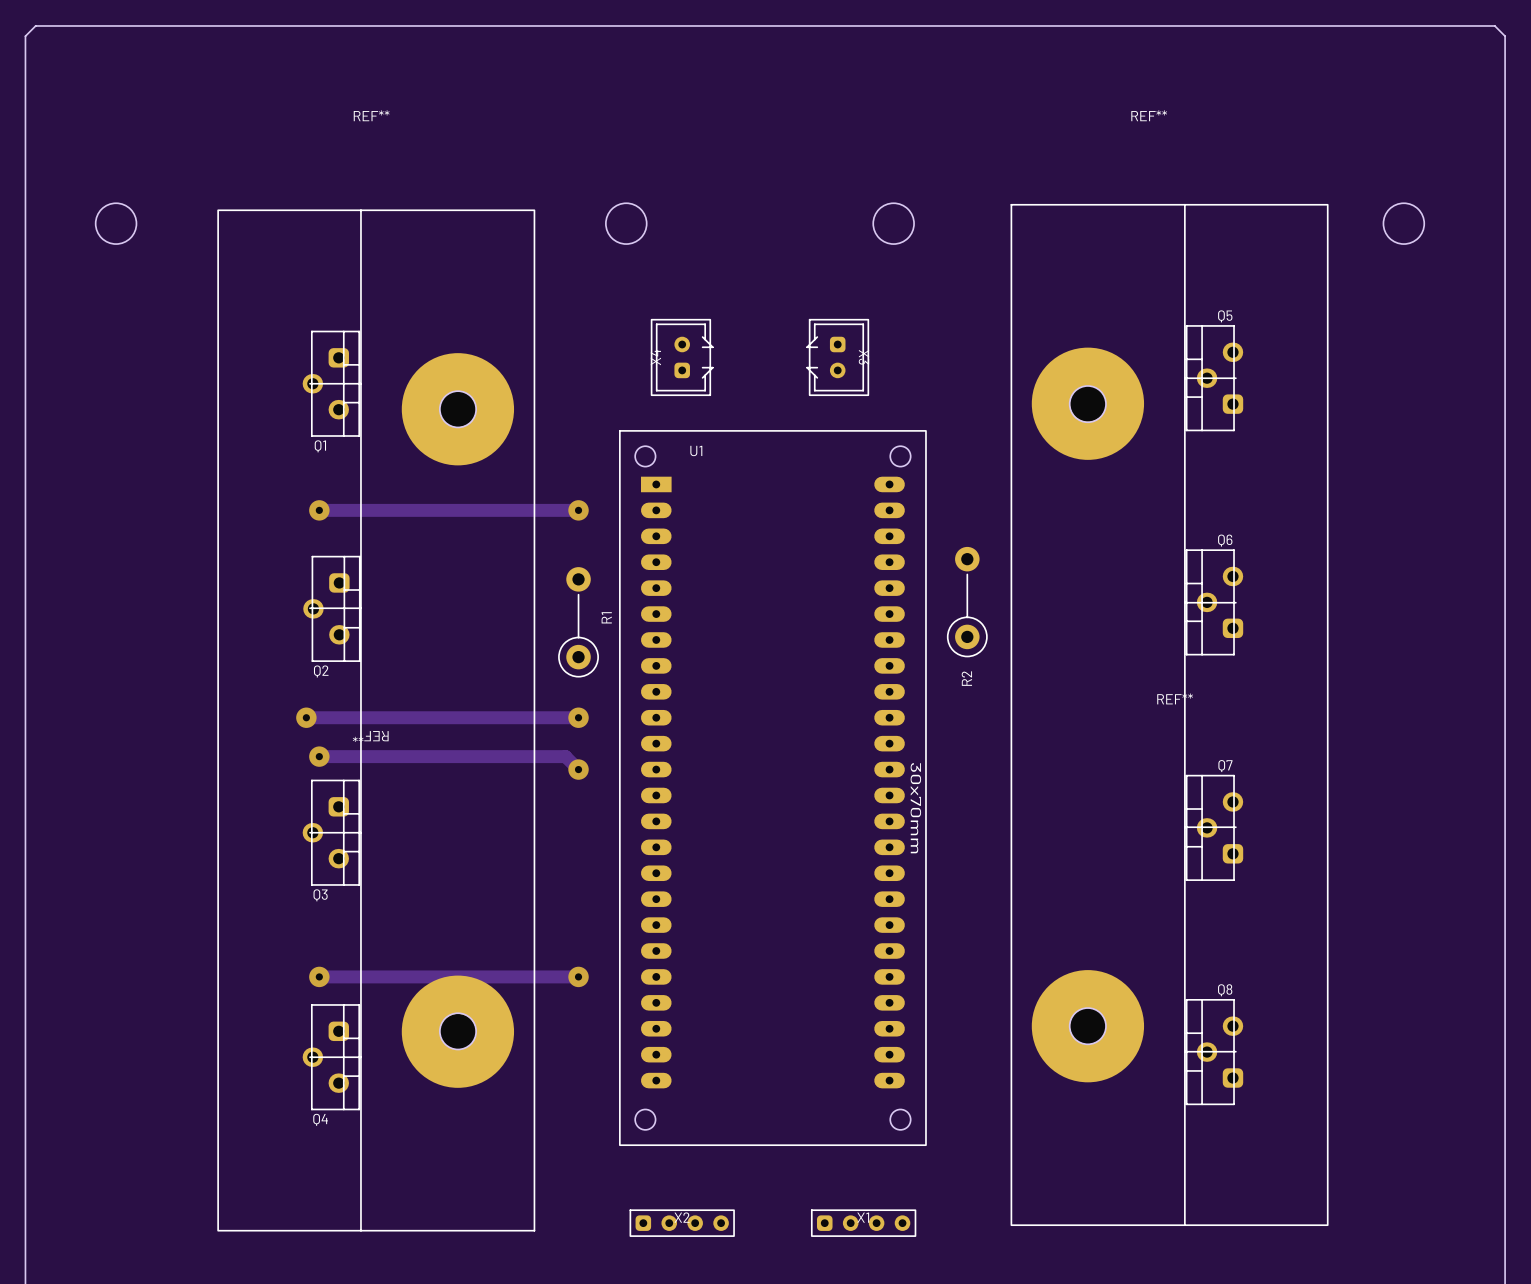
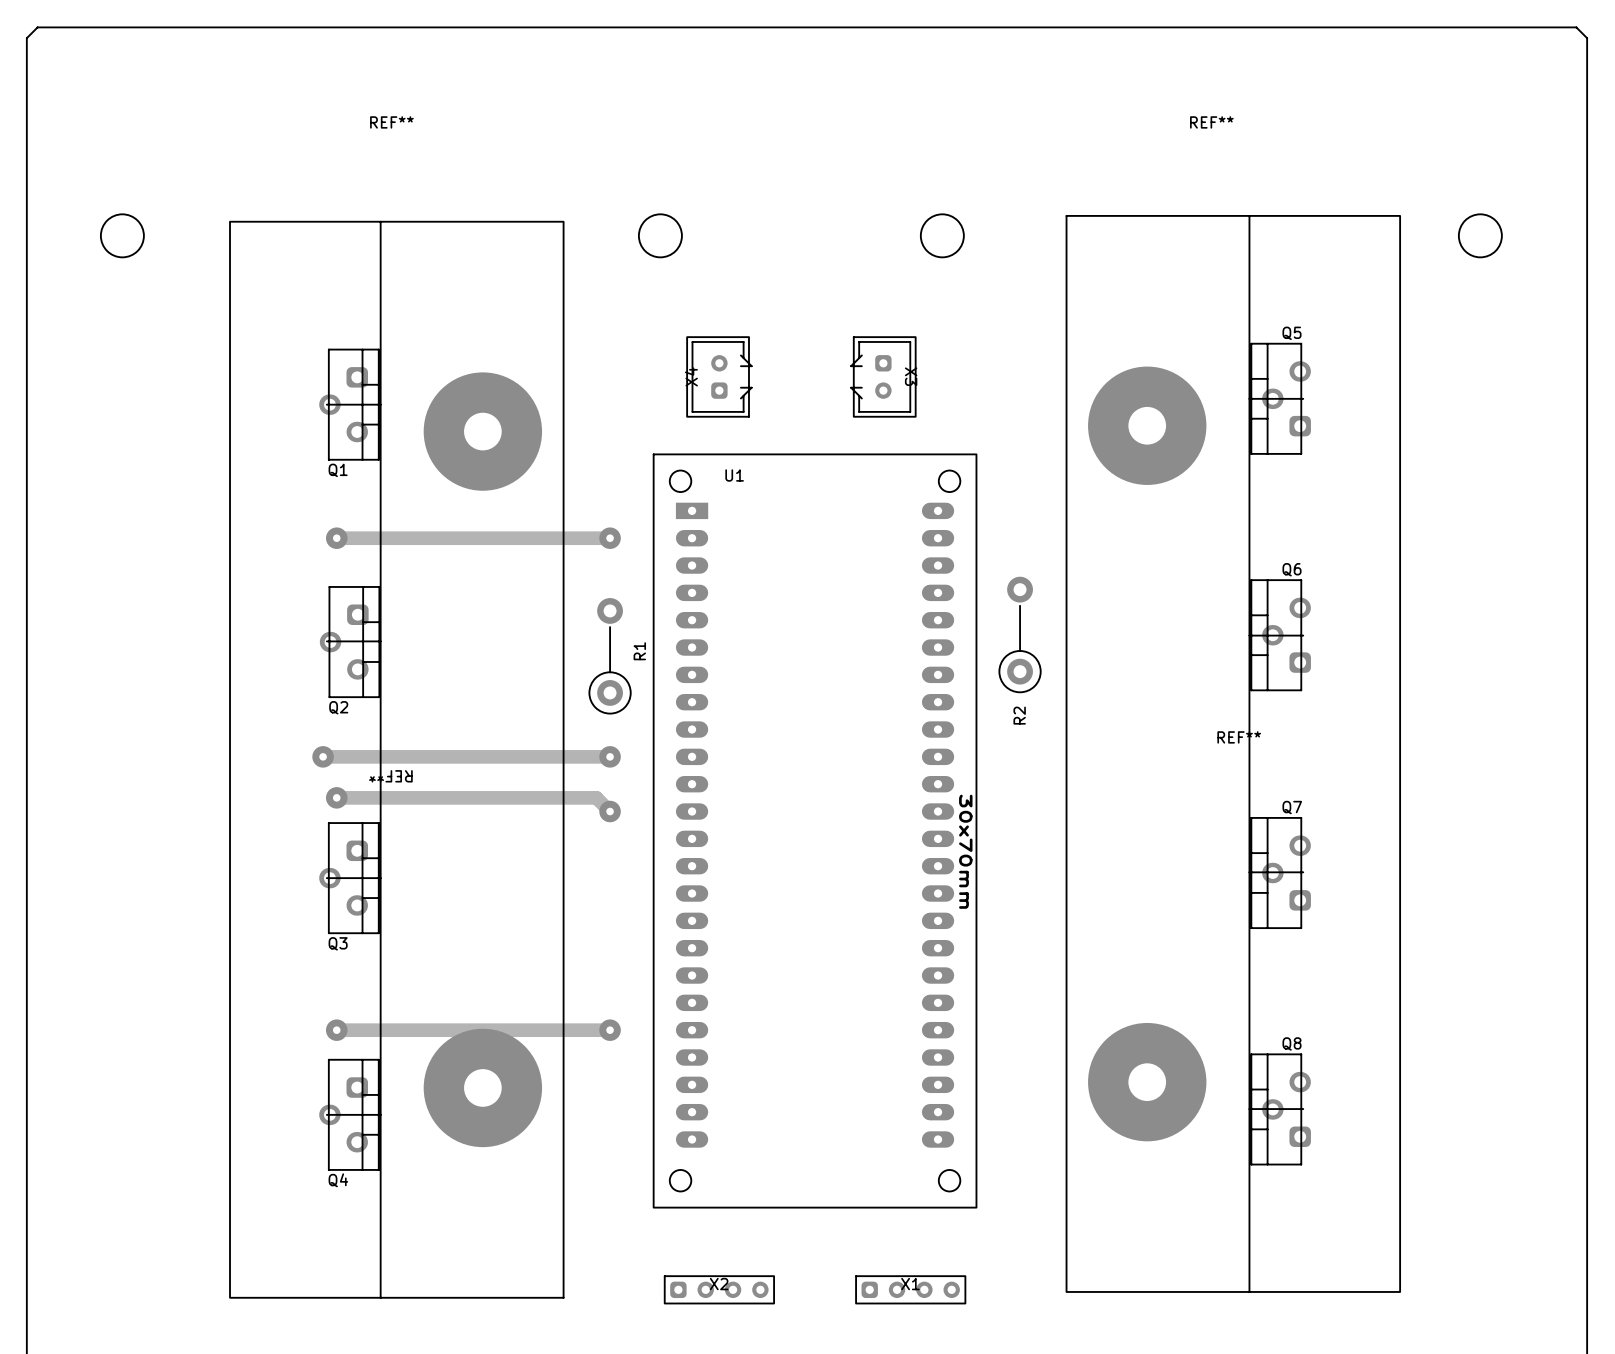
REF** footprint: [1010, 204, 1329, 1226] -> [1065, 215, 1401, 1293]
REF** footprint: [217, 209, 536, 1232] -> [229, 221, 565, 1299]

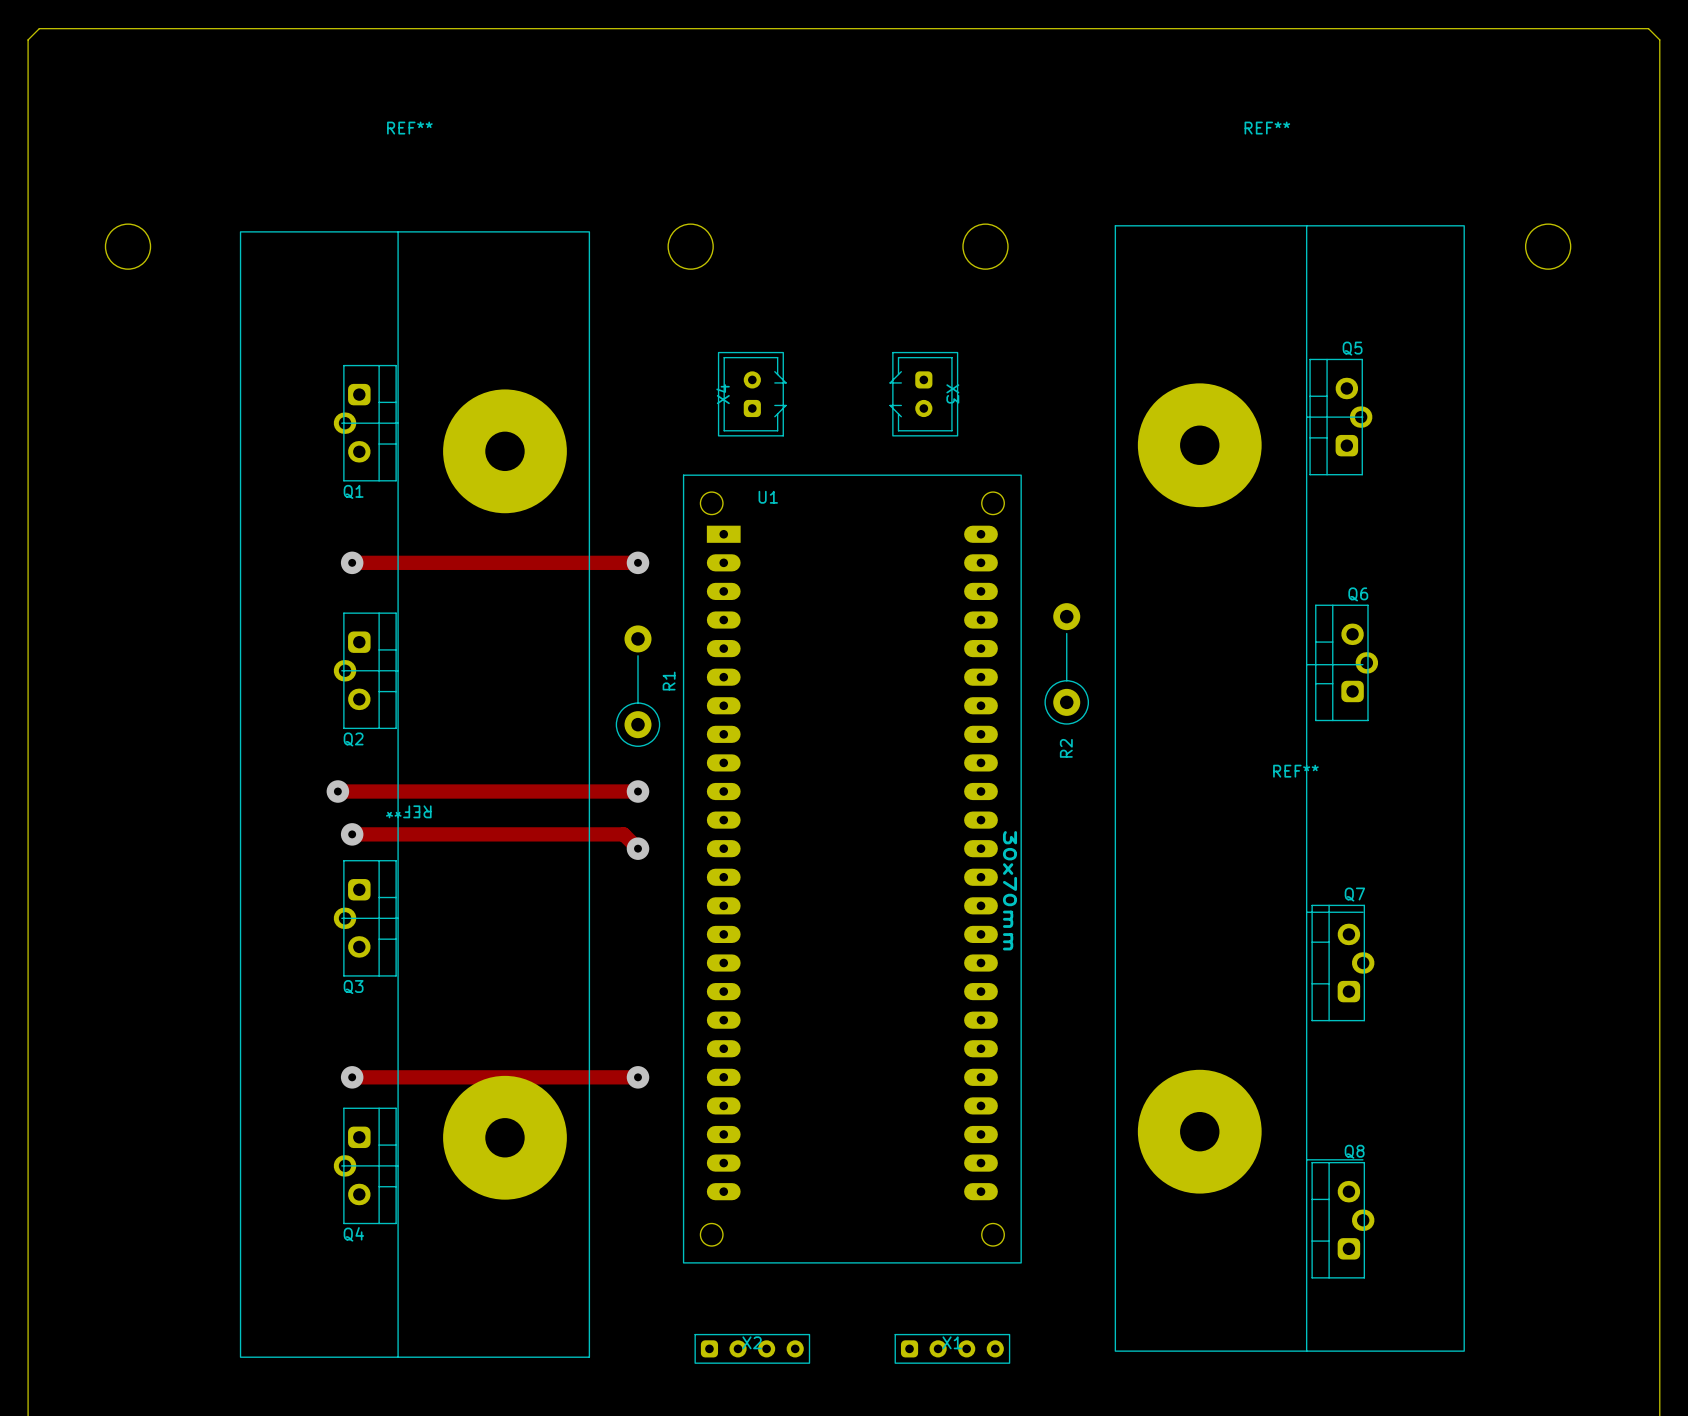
Q5 footprint: [1250, 343, 1311, 455] -> [1309, 358, 1373, 476]
Q1 footprint: [319, 348, 380, 461] -> [333, 364, 397, 482]
Q6 footprint: [1250, 579, 1311, 691] -> [1315, 604, 1379, 722]
Q2 footprint: [319, 586, 381, 698] -> [333, 612, 397, 730]
Q7 footprint: [1250, 817, 1311, 929] -> [1311, 904, 1375, 1022]
Q3 footprint: [319, 822, 380, 934] -> [333, 860, 397, 977]
Q8 footprint: [1250, 1053, 1311, 1166] -> [1311, 1161, 1375, 1279]
Q4 footprint: [319, 1059, 380, 1171] -> [333, 1107, 397, 1225]

